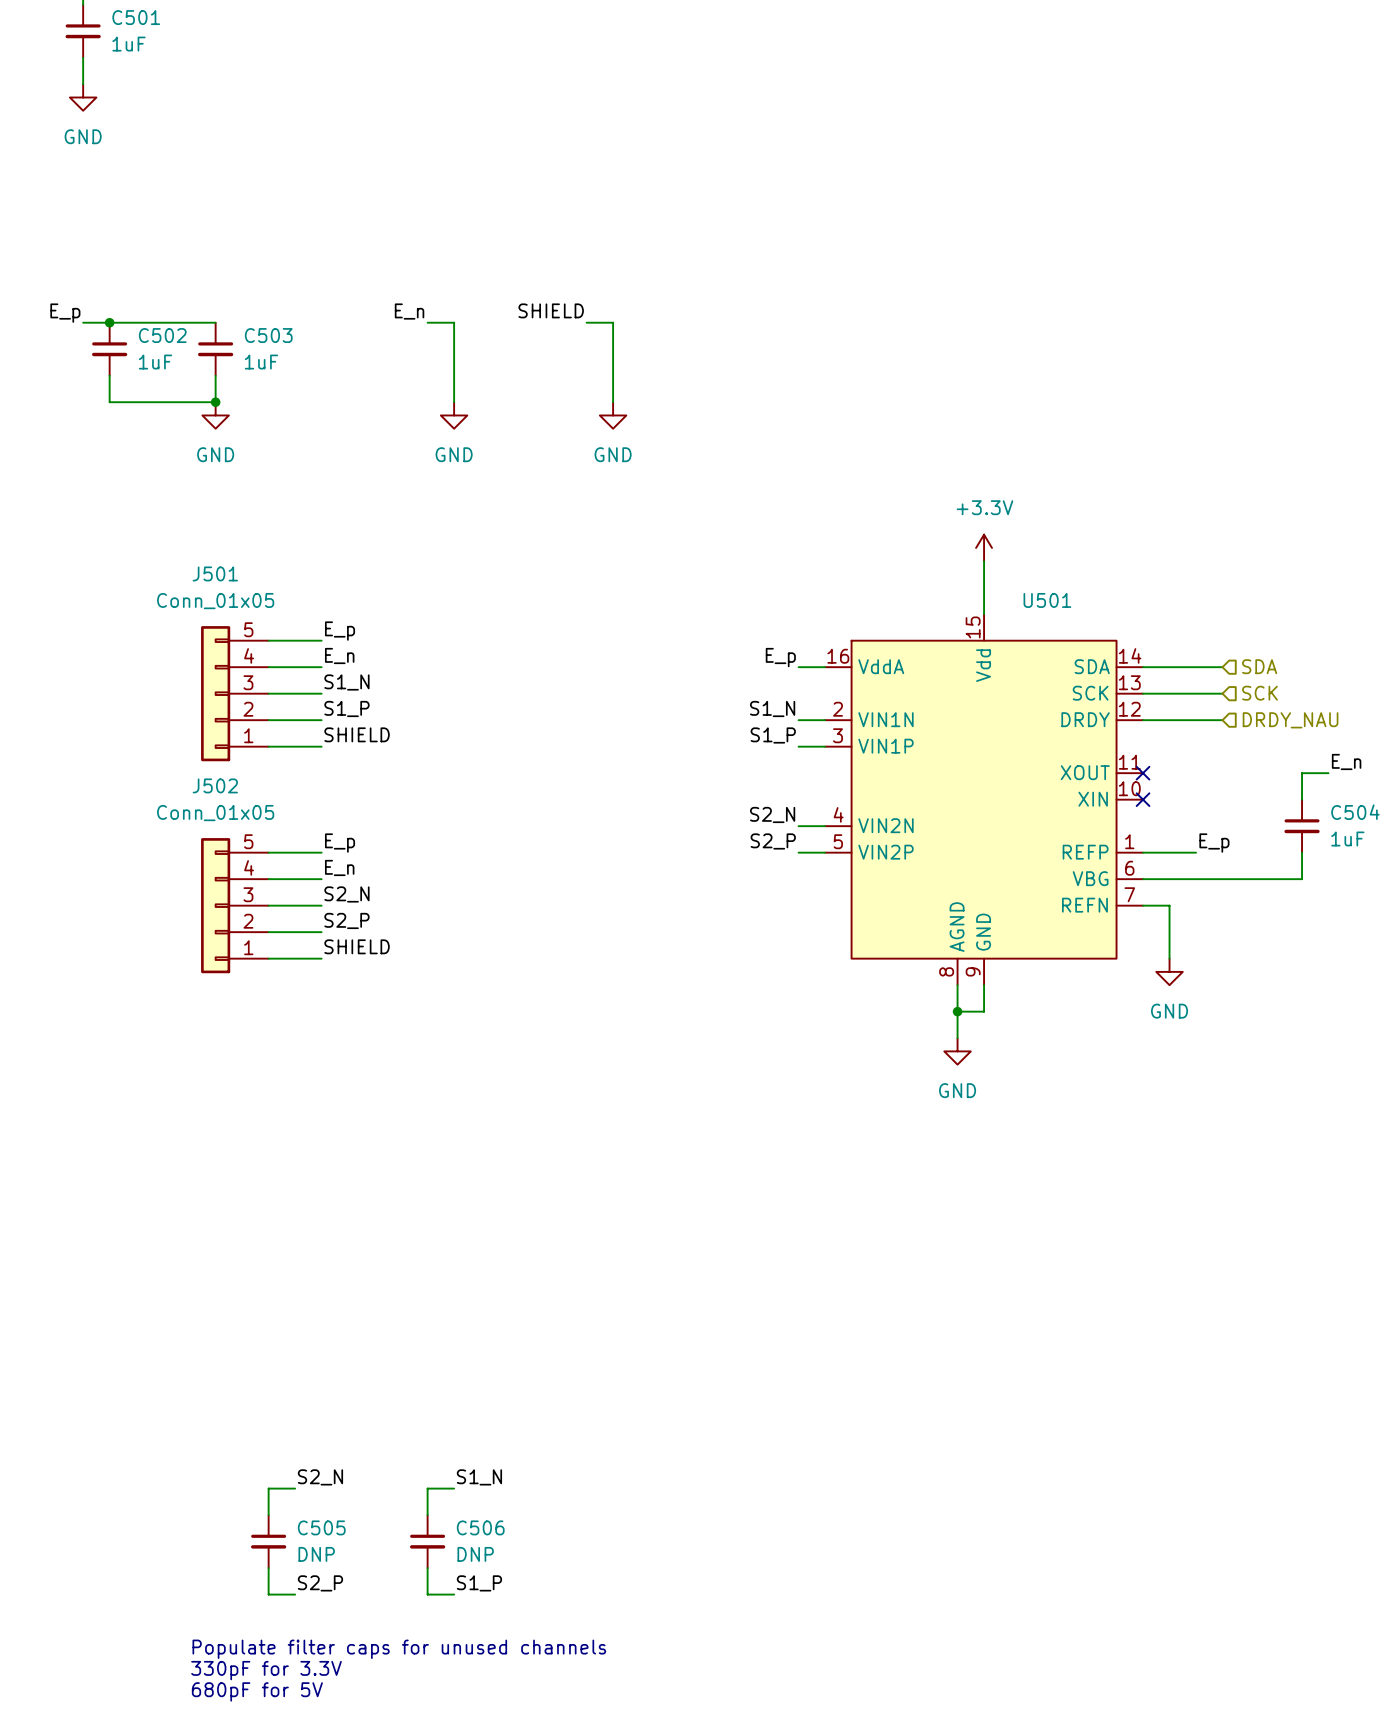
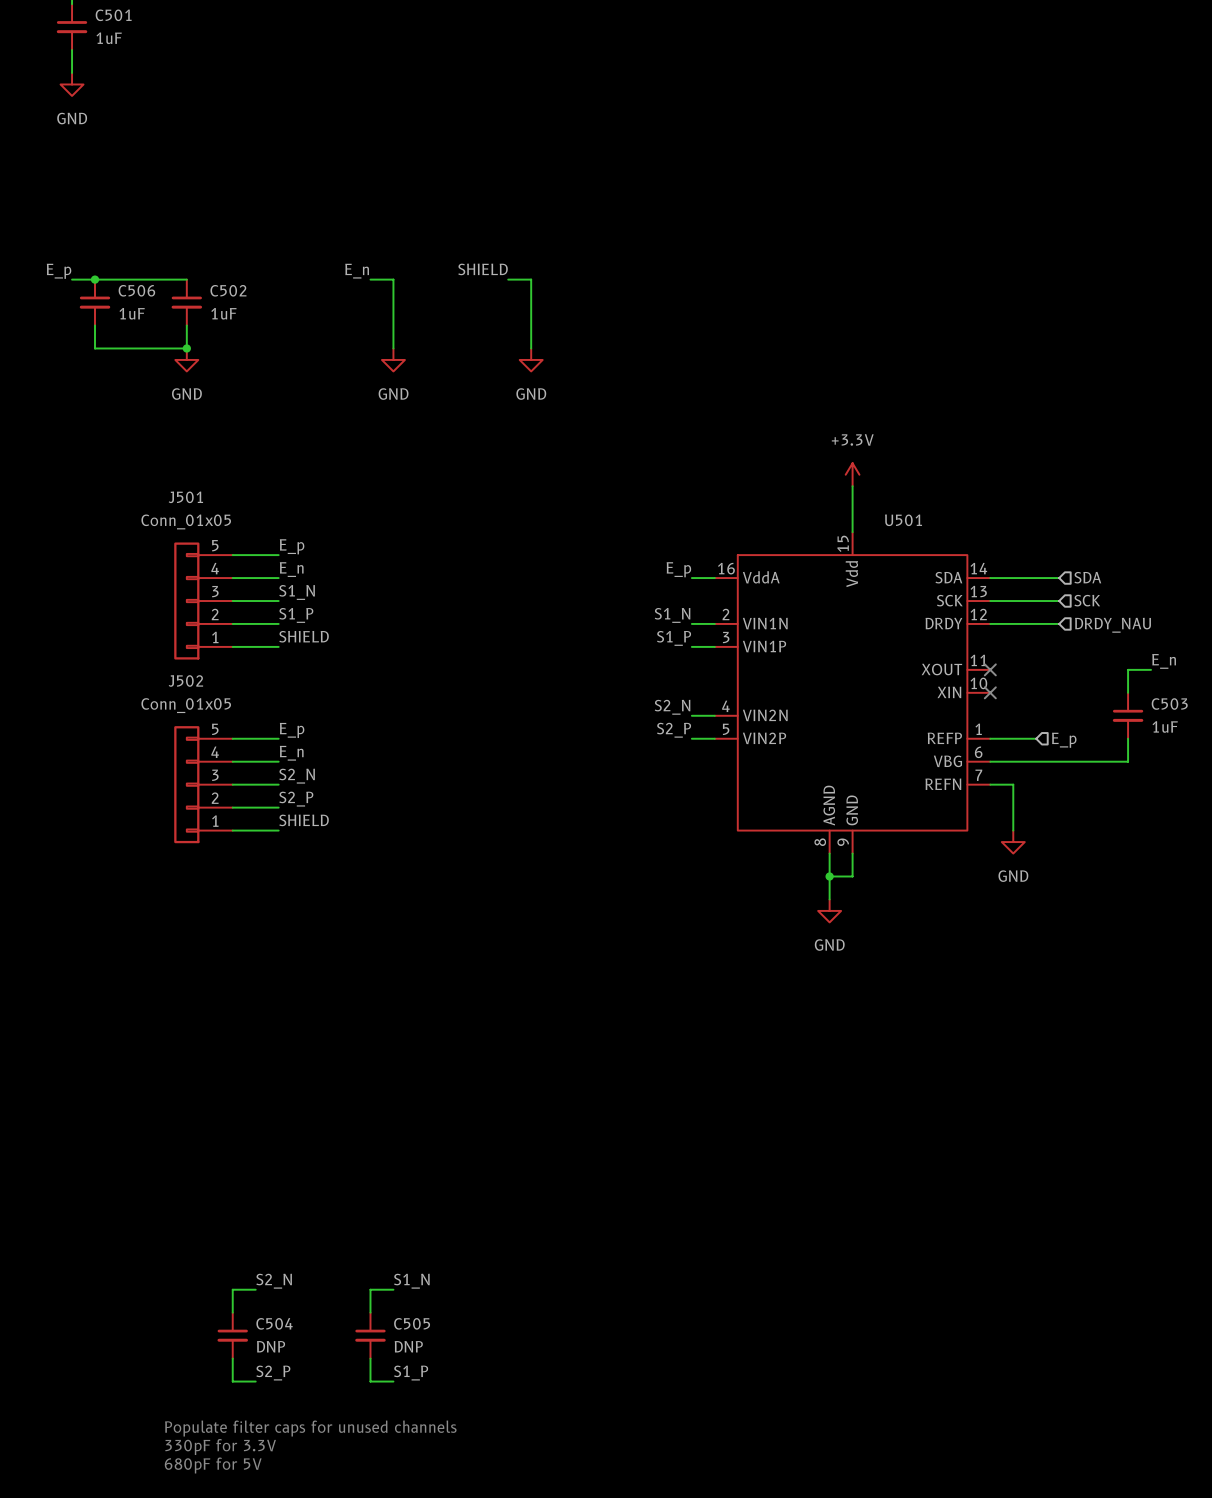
C502 name: C502 (162, 335) -> C506 (136, 290)
C503 name: C503 (268, 335) -> C502 (228, 290)
C504 name: C504 (1355, 812) -> C503 (1169, 704)
label: E_p (1214, 843) -> none
hierarchical label: none -> E_p (1064, 740)
C505 name: C505 (321, 1527) -> C504 (274, 1323)
C506 name: C506 (480, 1527) -> C505 (412, 1323)

